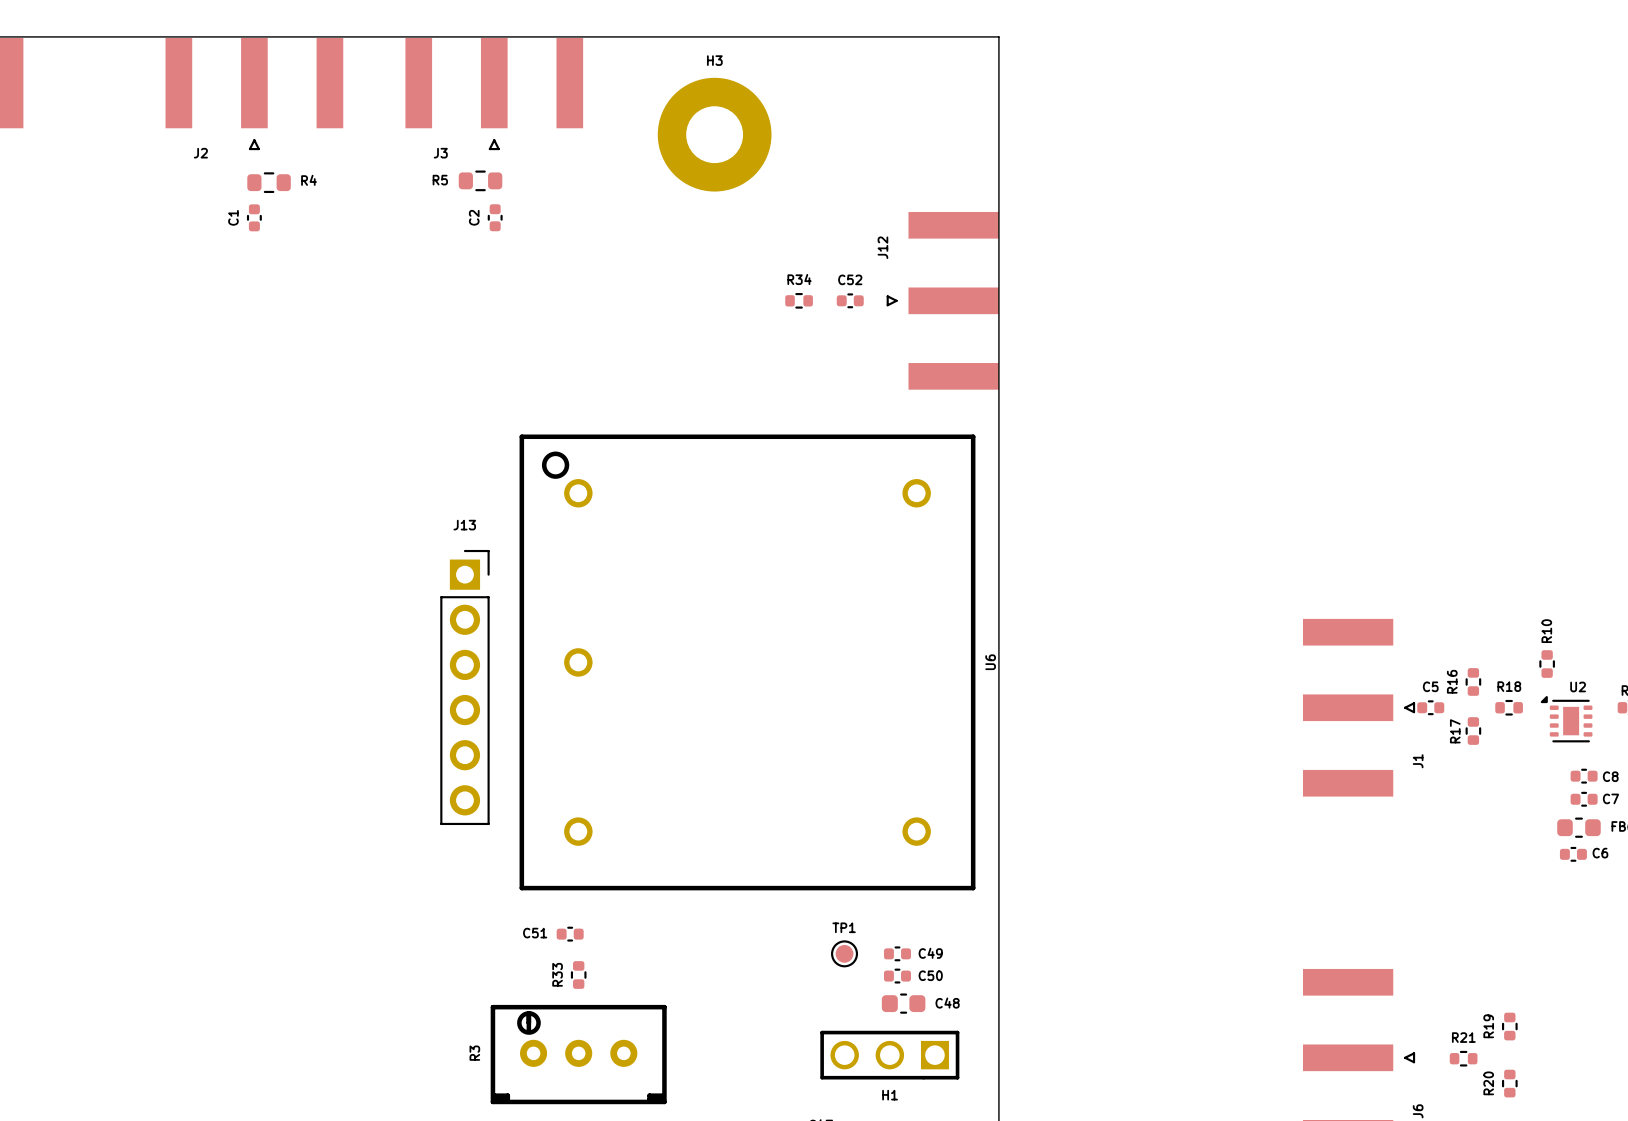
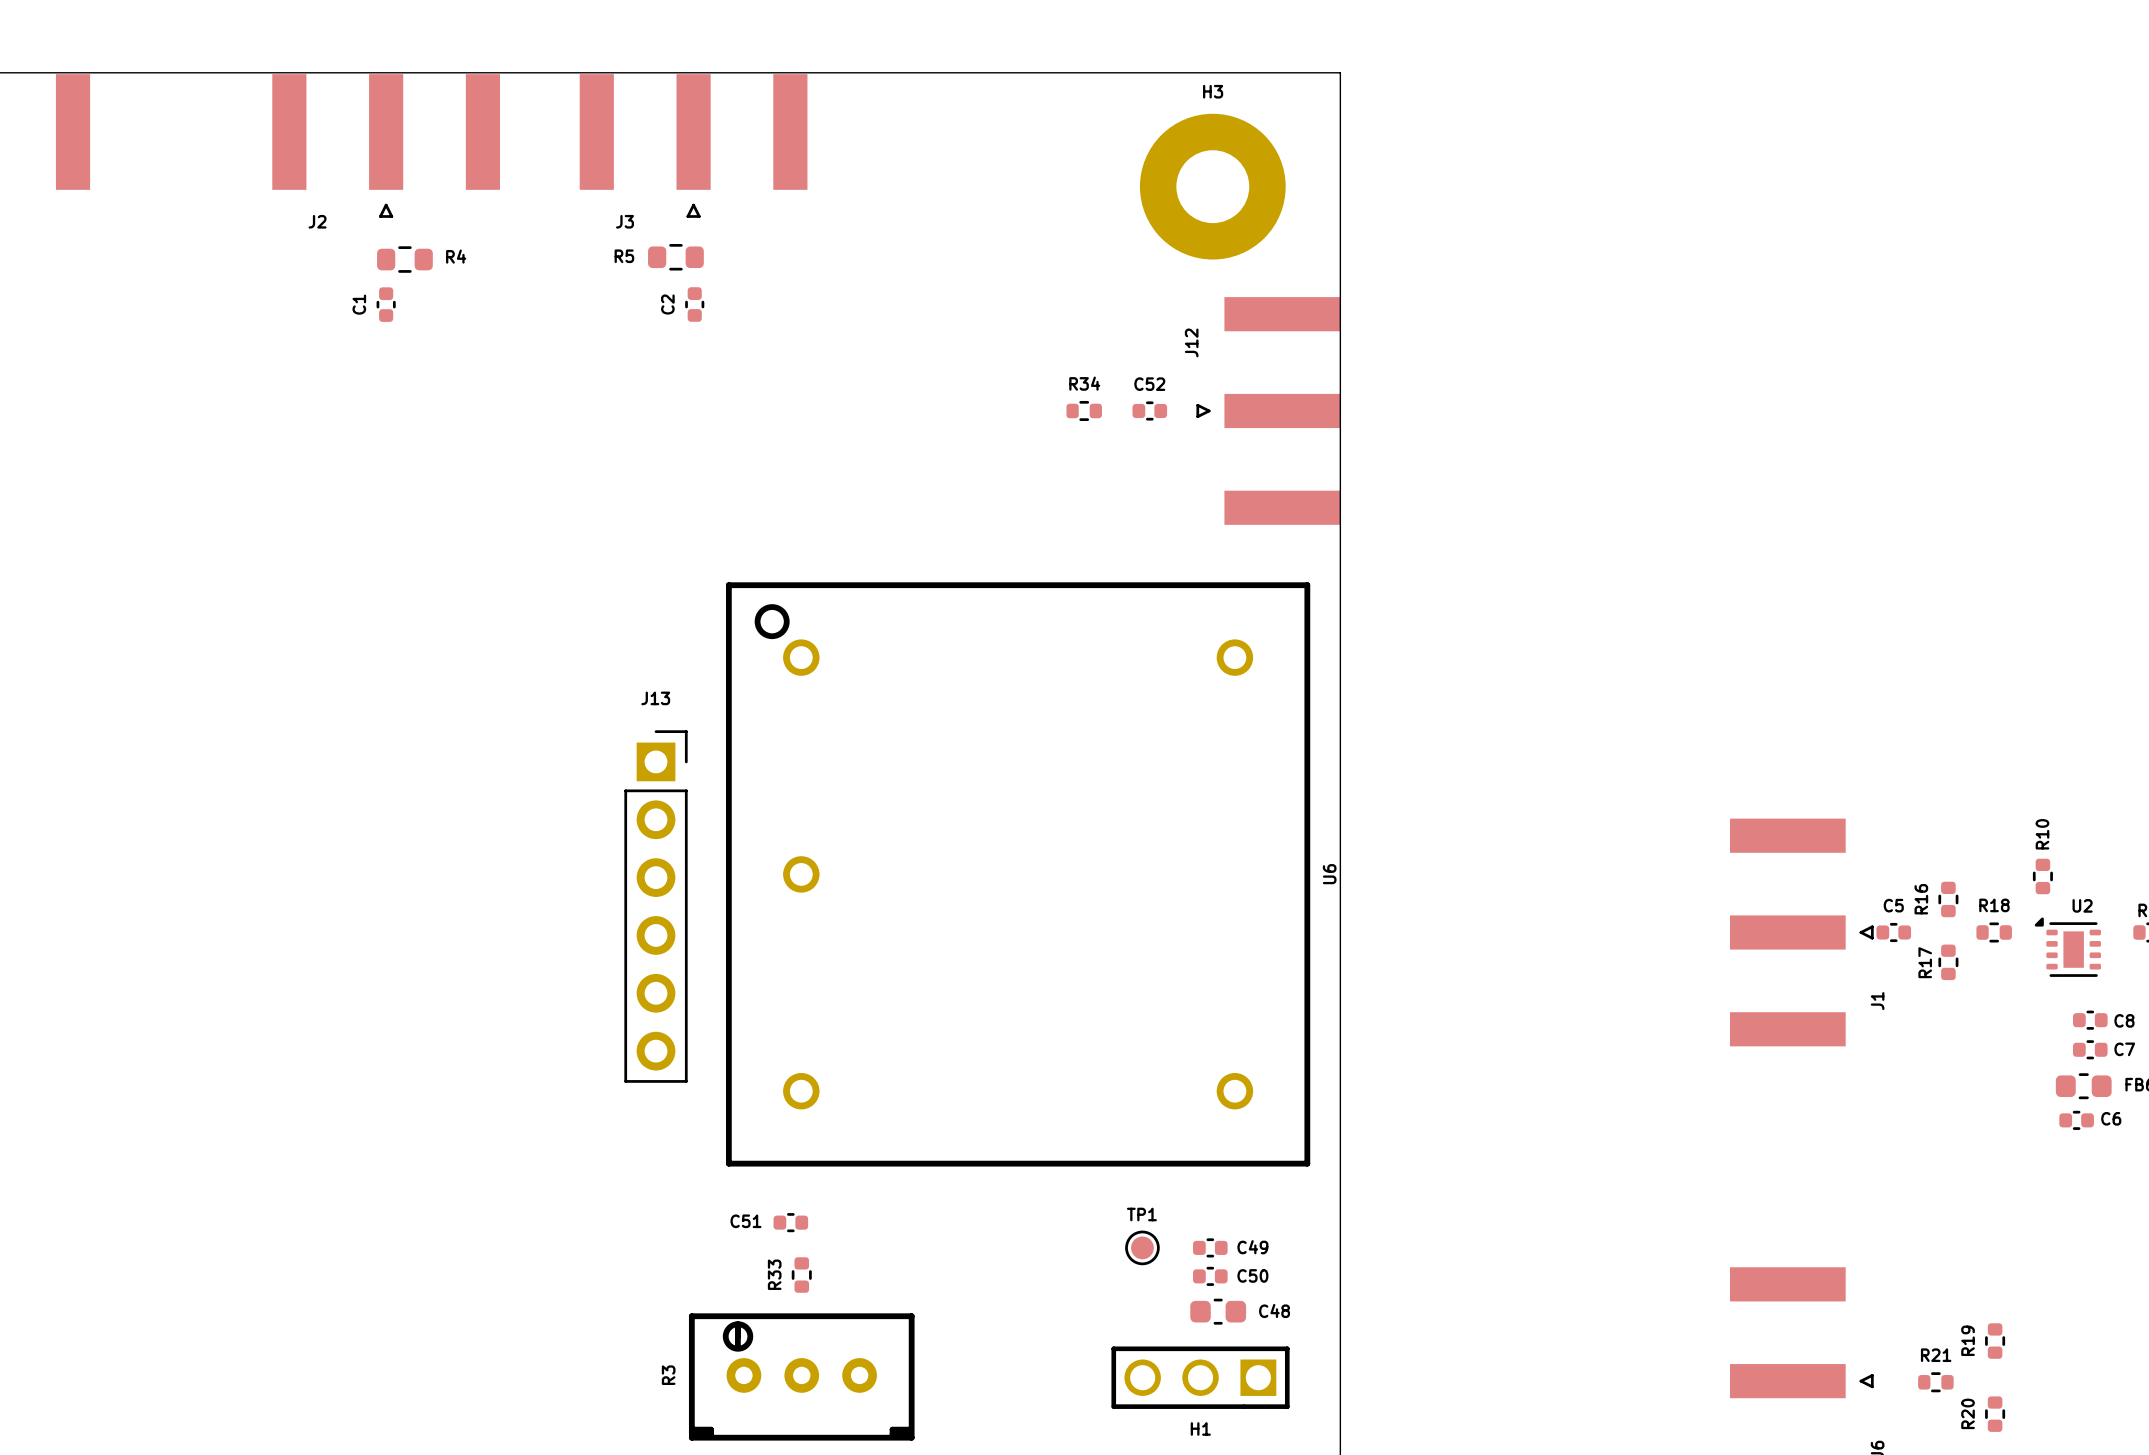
H3 position: (714, 134) -> (1212, 186)

